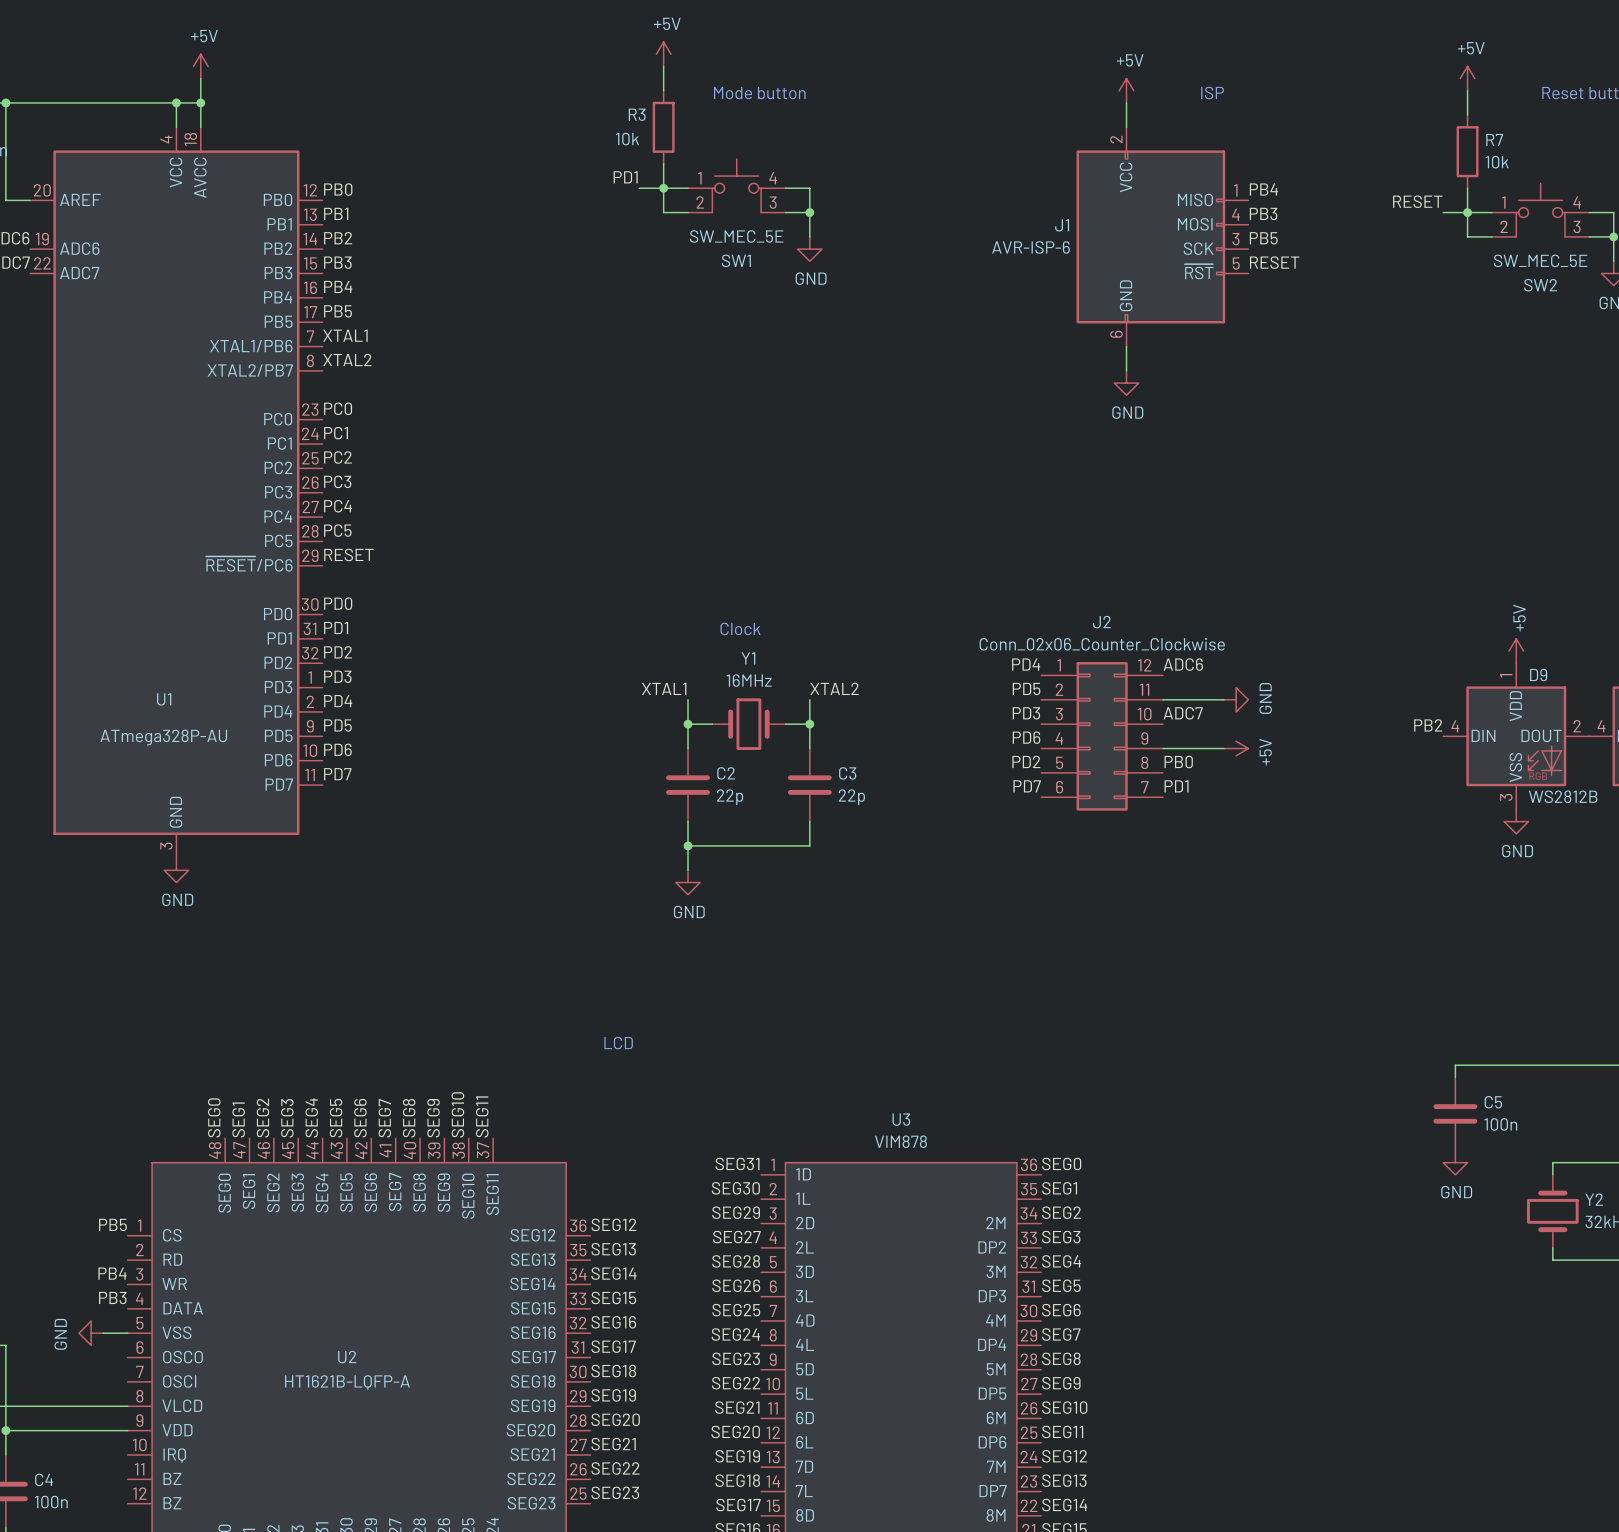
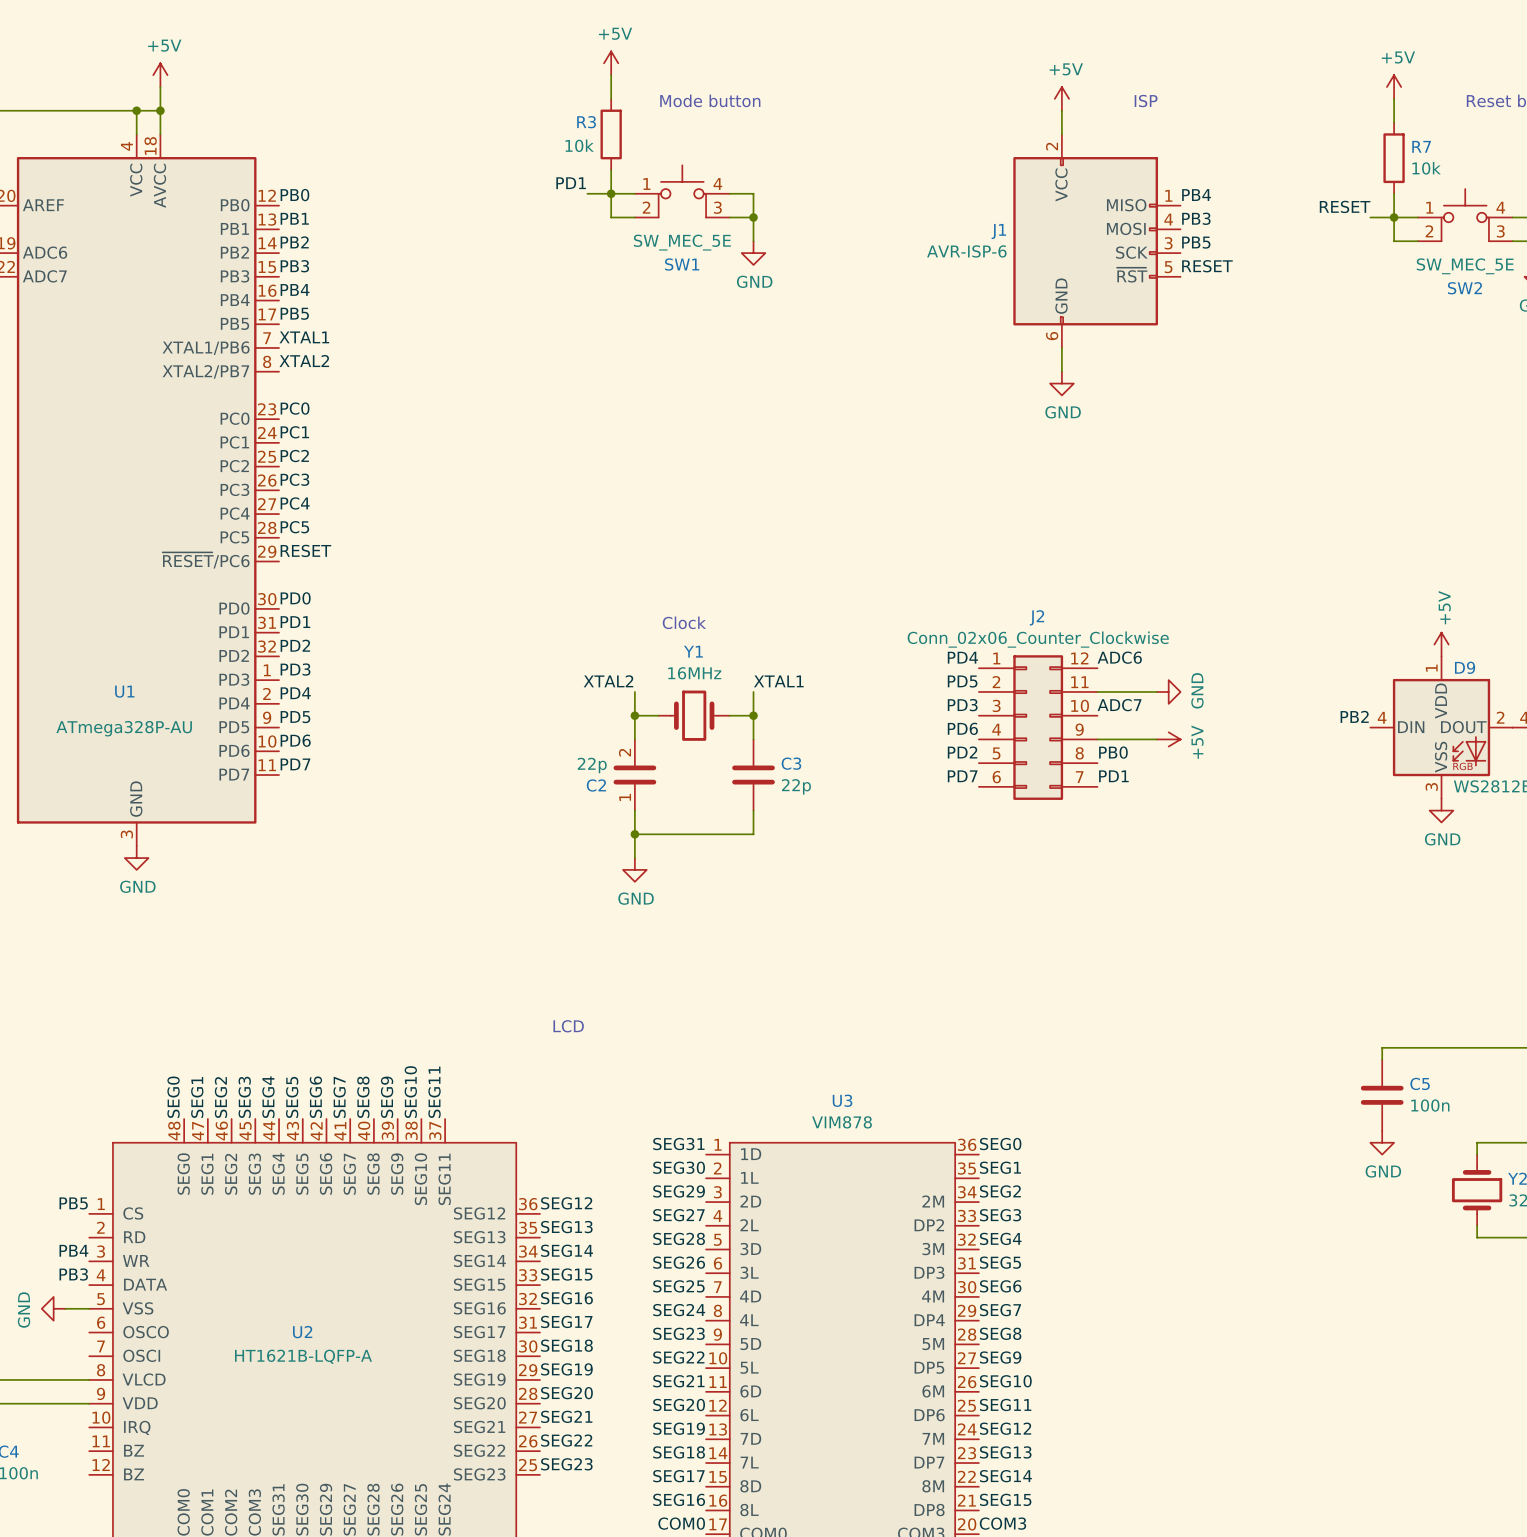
label: XTAL1 (664, 688) -> XTAL2 (608, 681)
label: XTAL2 (834, 688) -> XTAL1 (778, 681)
C2 pin number: none -> 2 (625, 752)
C2 name position: C2 (726, 773) -> C2 (596, 785)
C2 value position: 22p (730, 797) -> 22p (592, 765)
C2 pin number: none -> 1 (625, 797)

